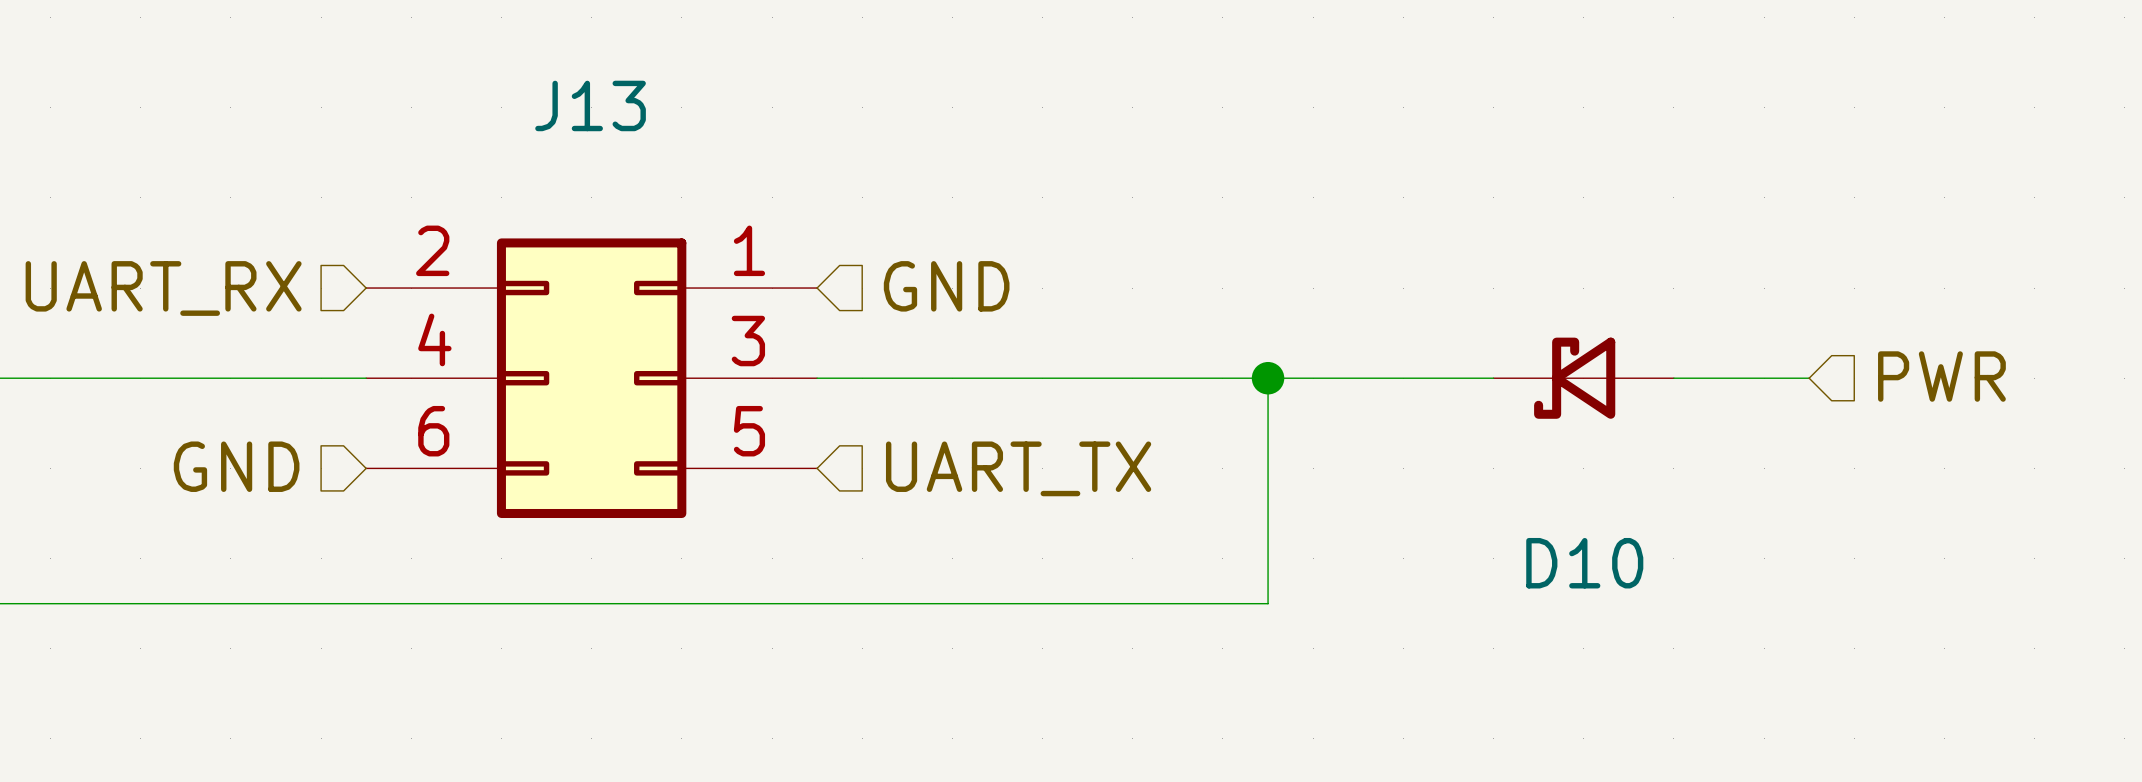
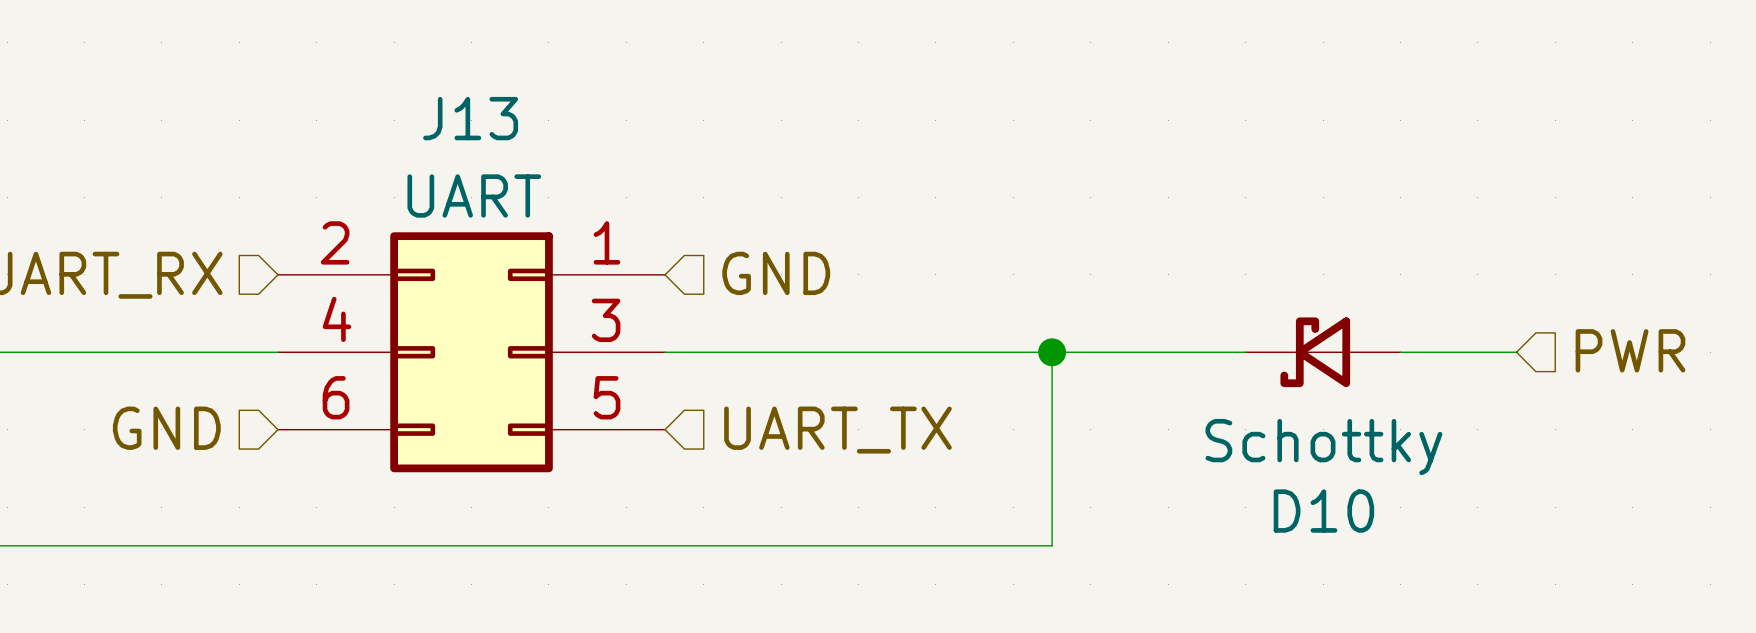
J13 value: none -> UART (474, 196)
D10 value: none -> Schottky (1323, 447)

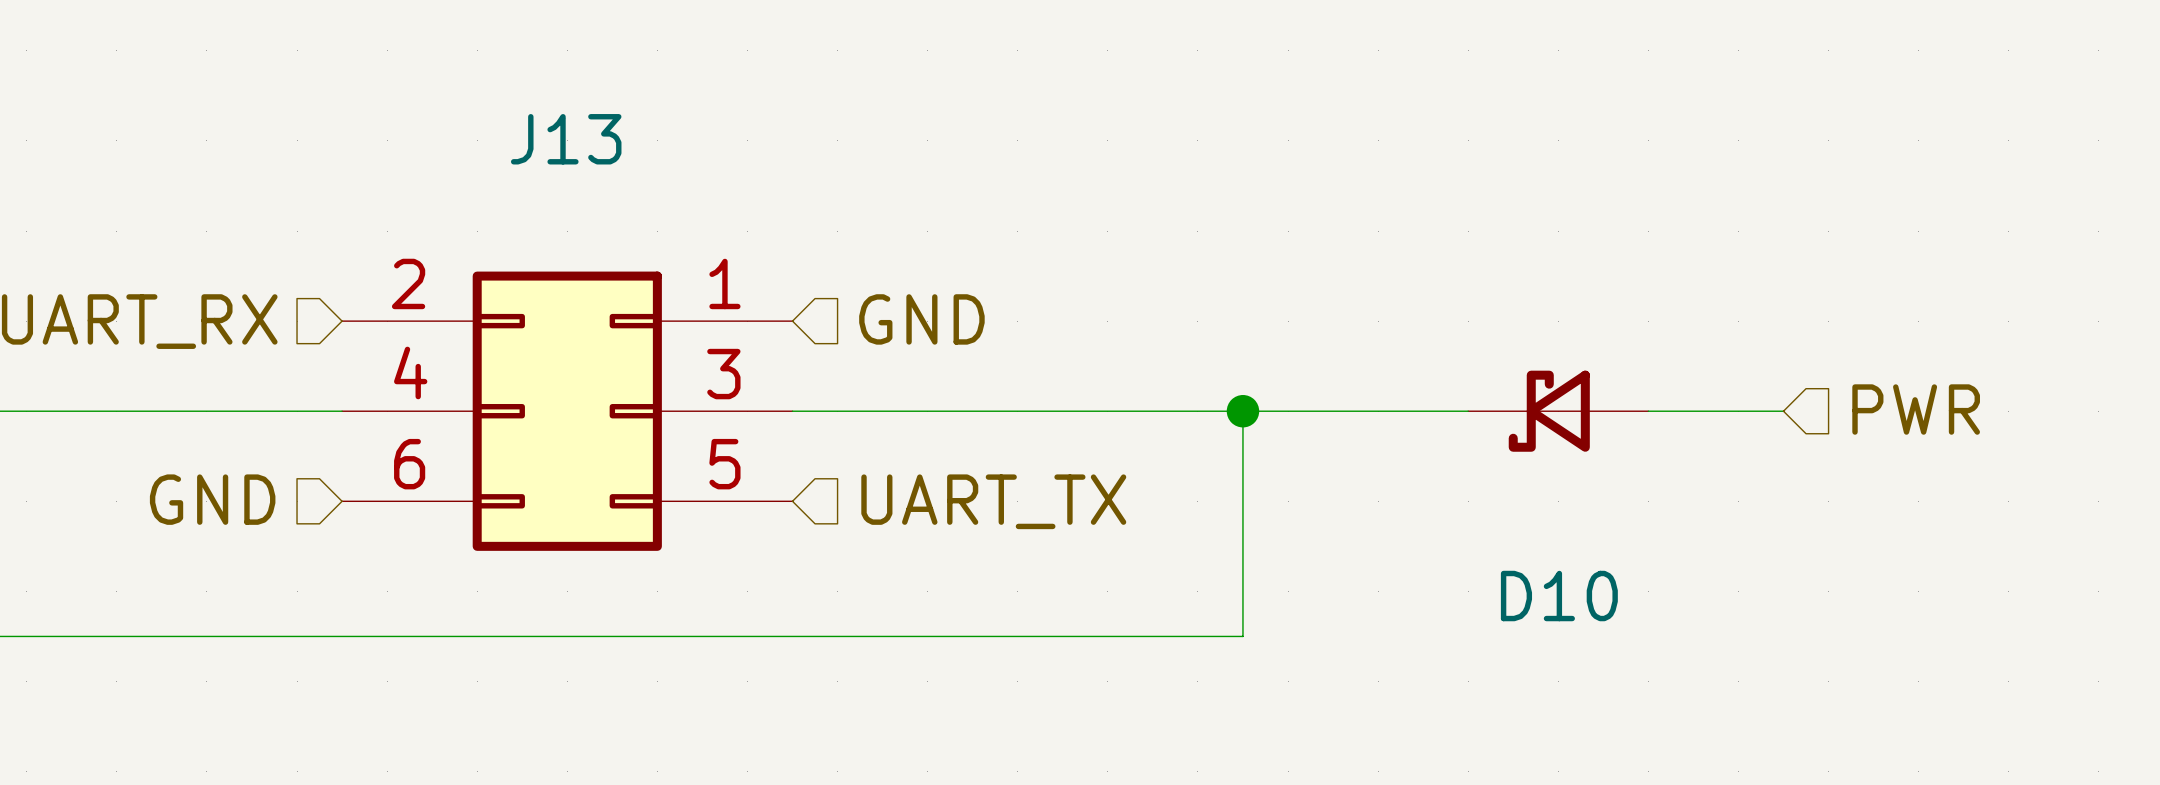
J13 value: UART (474, 196) -> none
D10 value: Schottky (1323, 447) -> none

